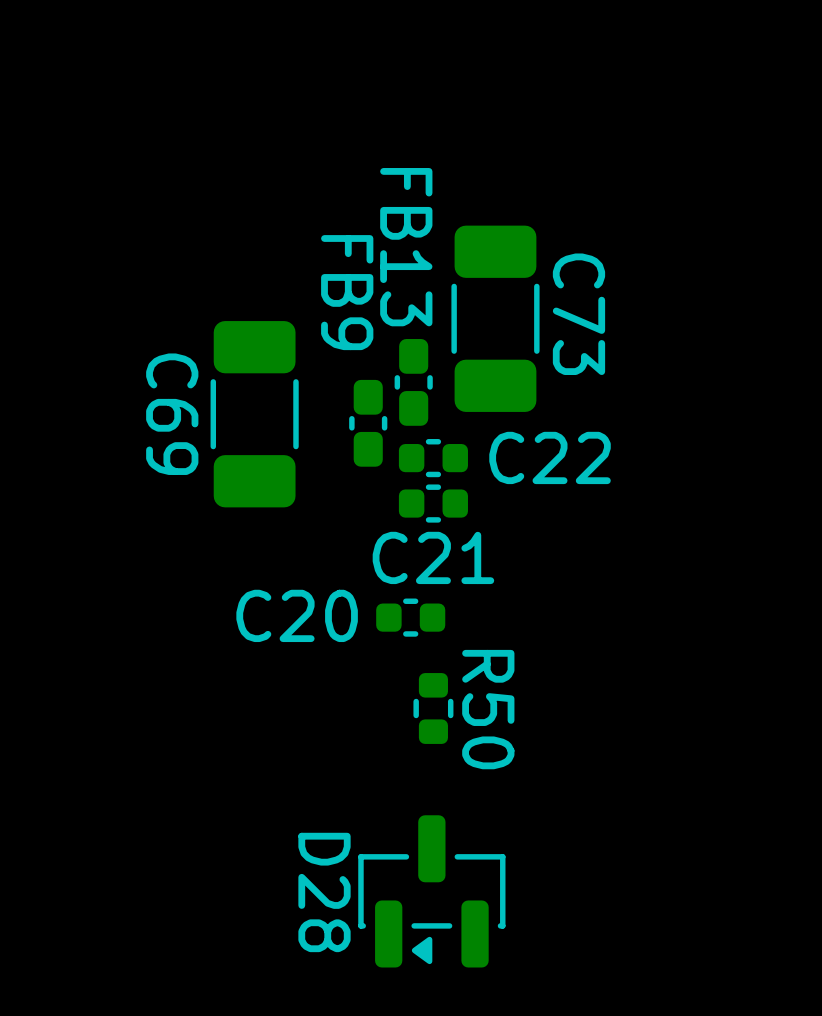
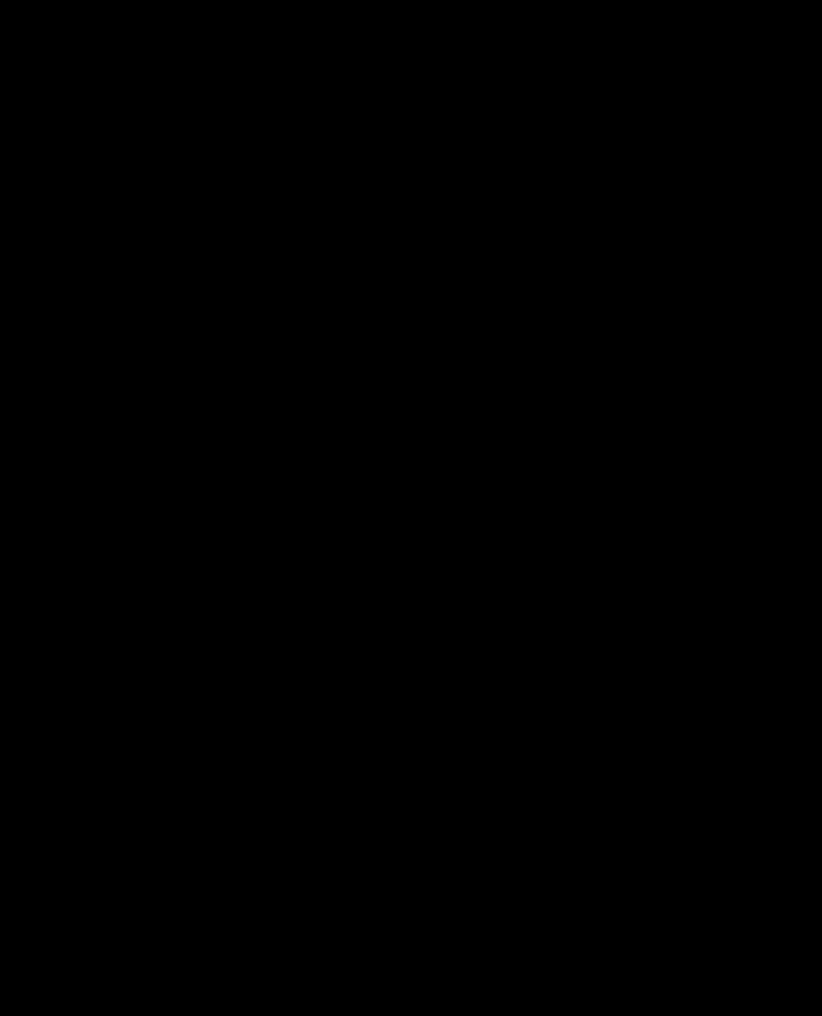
C73: (495, 318) -> none
FB13: (413, 382) -> none
C69: (254, 414) -> none
FB9: (368, 423) -> none
C22: (433, 458) -> none
C21: (433, 503) -> none
C20: (410, 617) -> none
R50: (433, 708) -> none
D28: (431, 891) -> none

